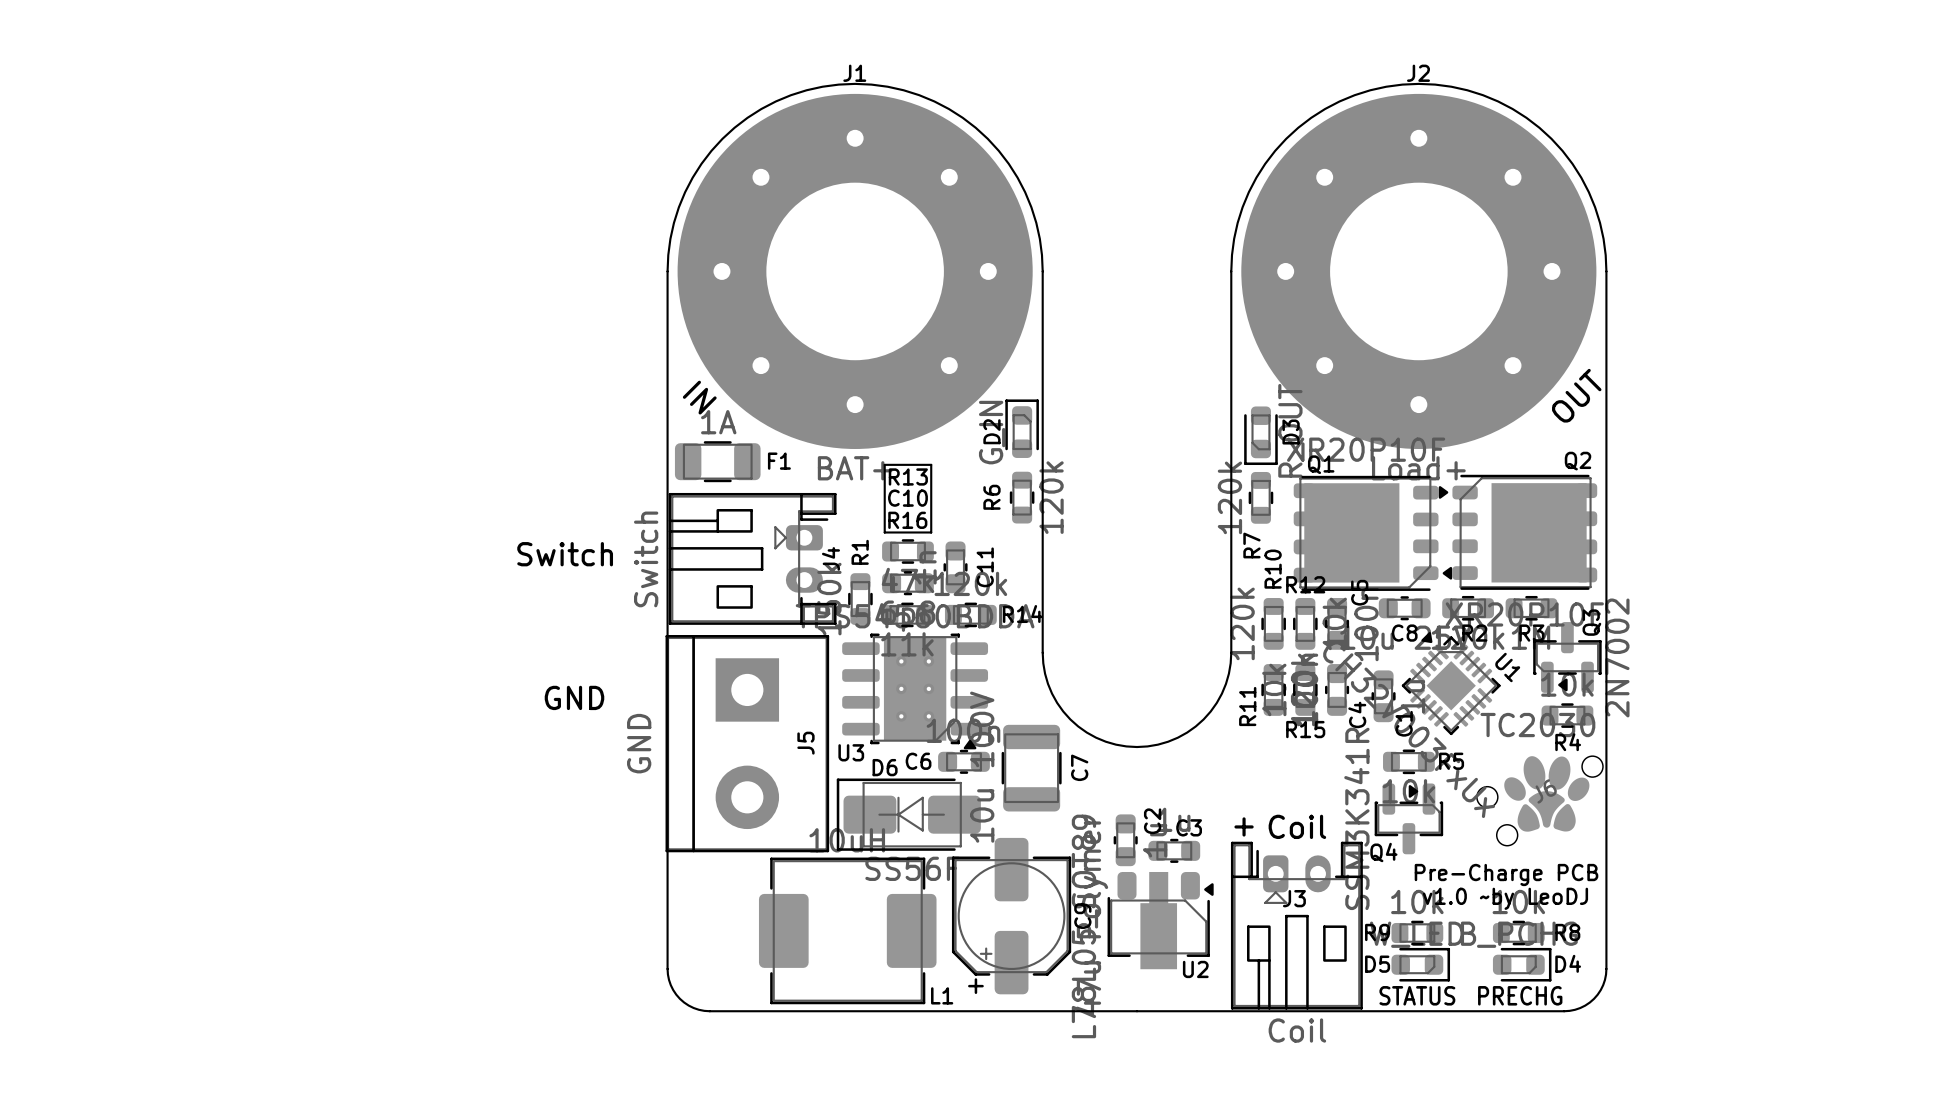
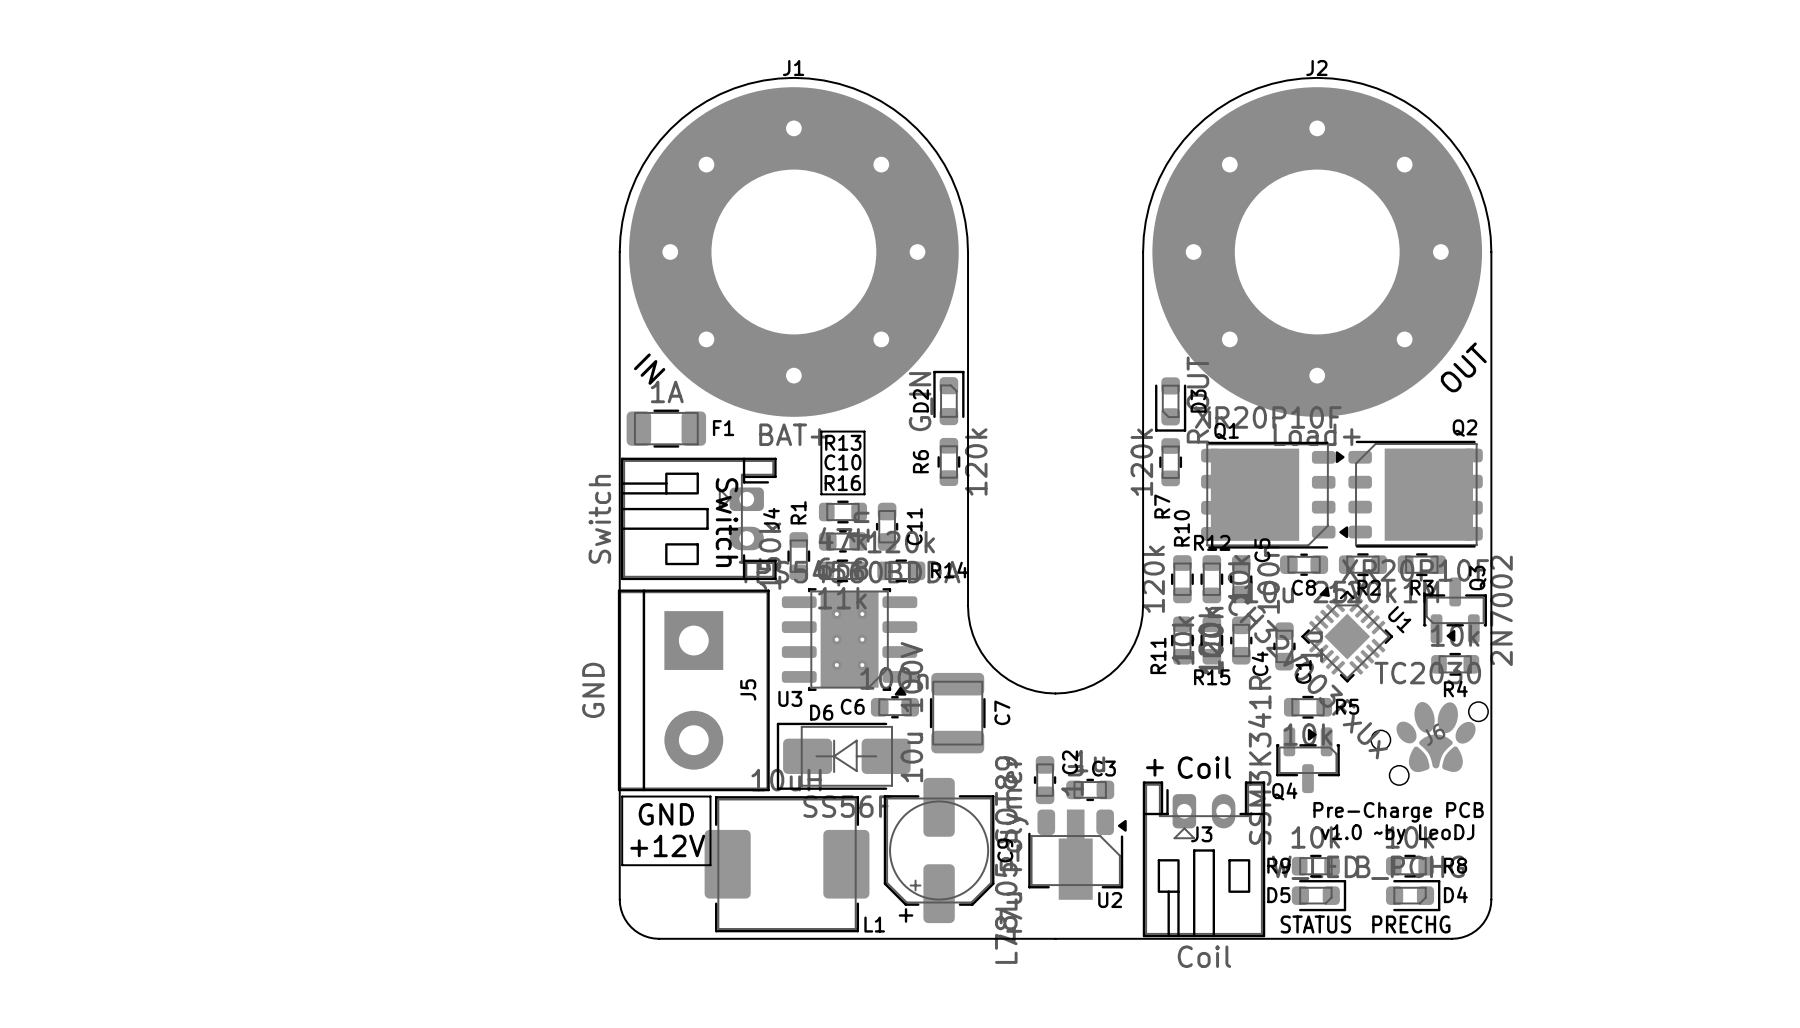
text rotation: 0° (565, 554) -> 90° clockwise (727, 522)
text position: Switch (565, 554) -> Switch (727, 522)
text position: GND (574, 697) -> GND (666, 814)
line: none -> (622, 796) (710, 796) (710, 865) (622, 865) (622, 796)
text: none -> +12V (667, 845)

